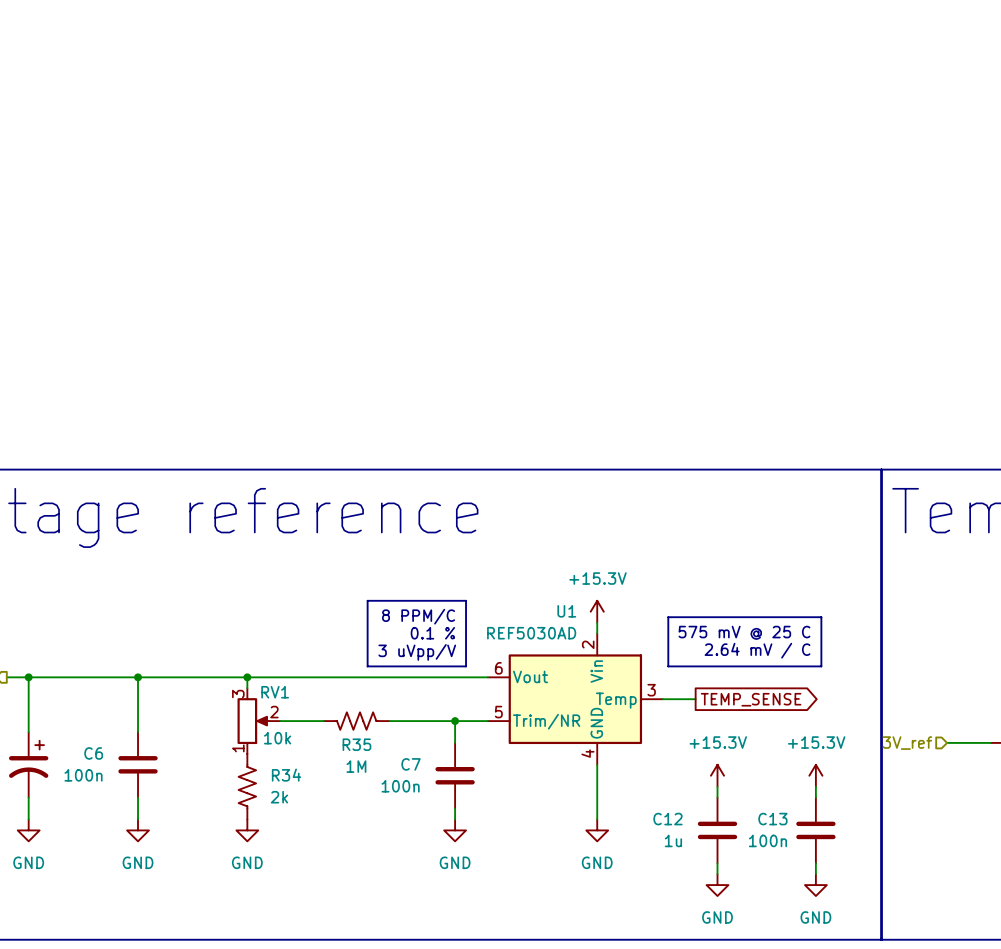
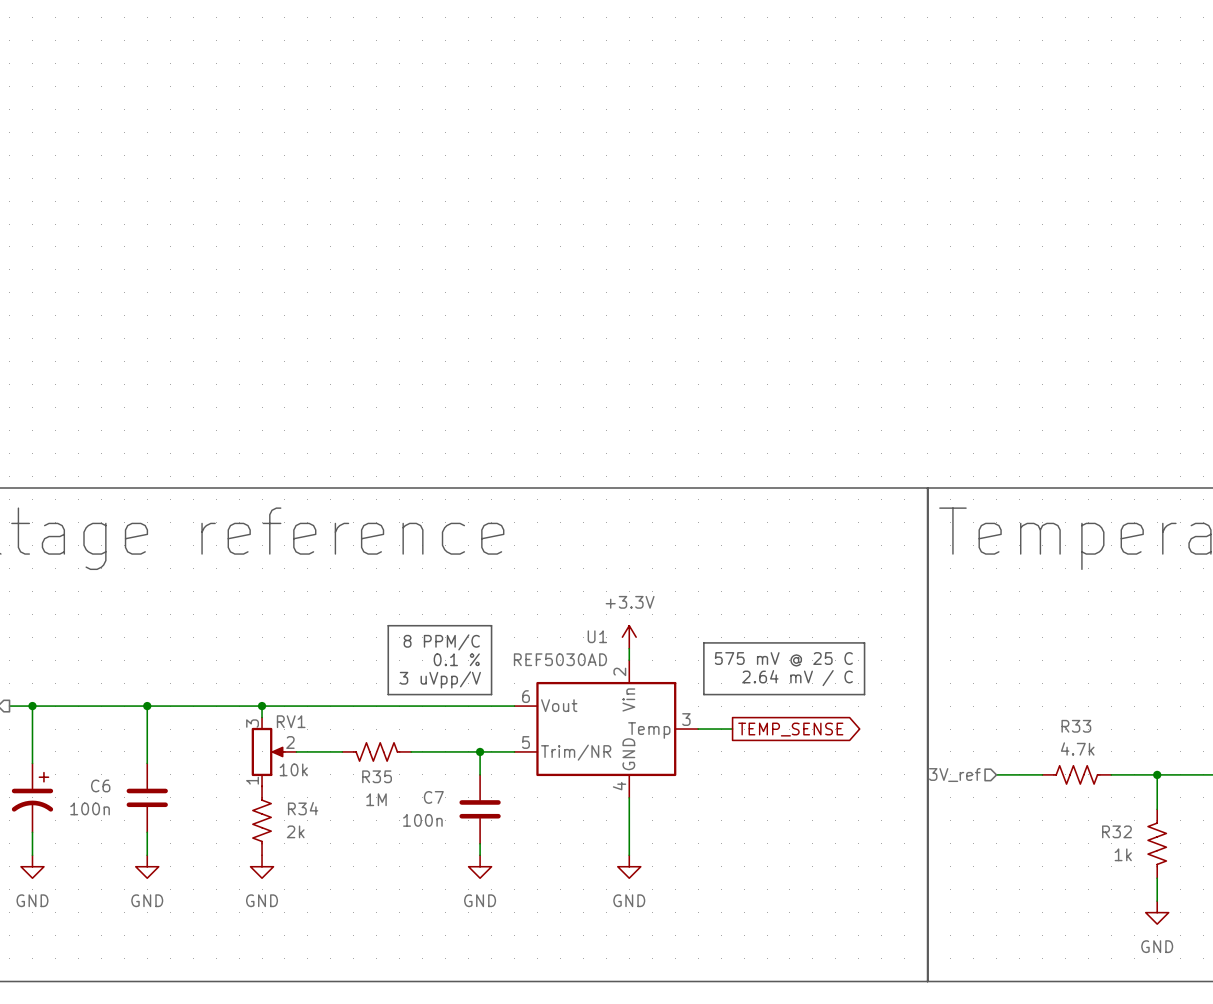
power symbol: +15.3V (597, 611) -> +3.3V (629, 637)
power symbol: +15.3V (717, 775) -> none
power symbol: +15.3V (815, 775) -> none
wire: (717, 786) (717, 797) -> none
wire: (815, 786) (815, 797) -> none
C12: 1u (717, 830) -> none
C13: 100n (815, 830) -> none
wire: (717, 863) (717, 874) -> none
wire: (815, 863) (815, 874) -> none
power symbol: GND (717, 885) -> none
power symbol: GND (815, 885) -> none

